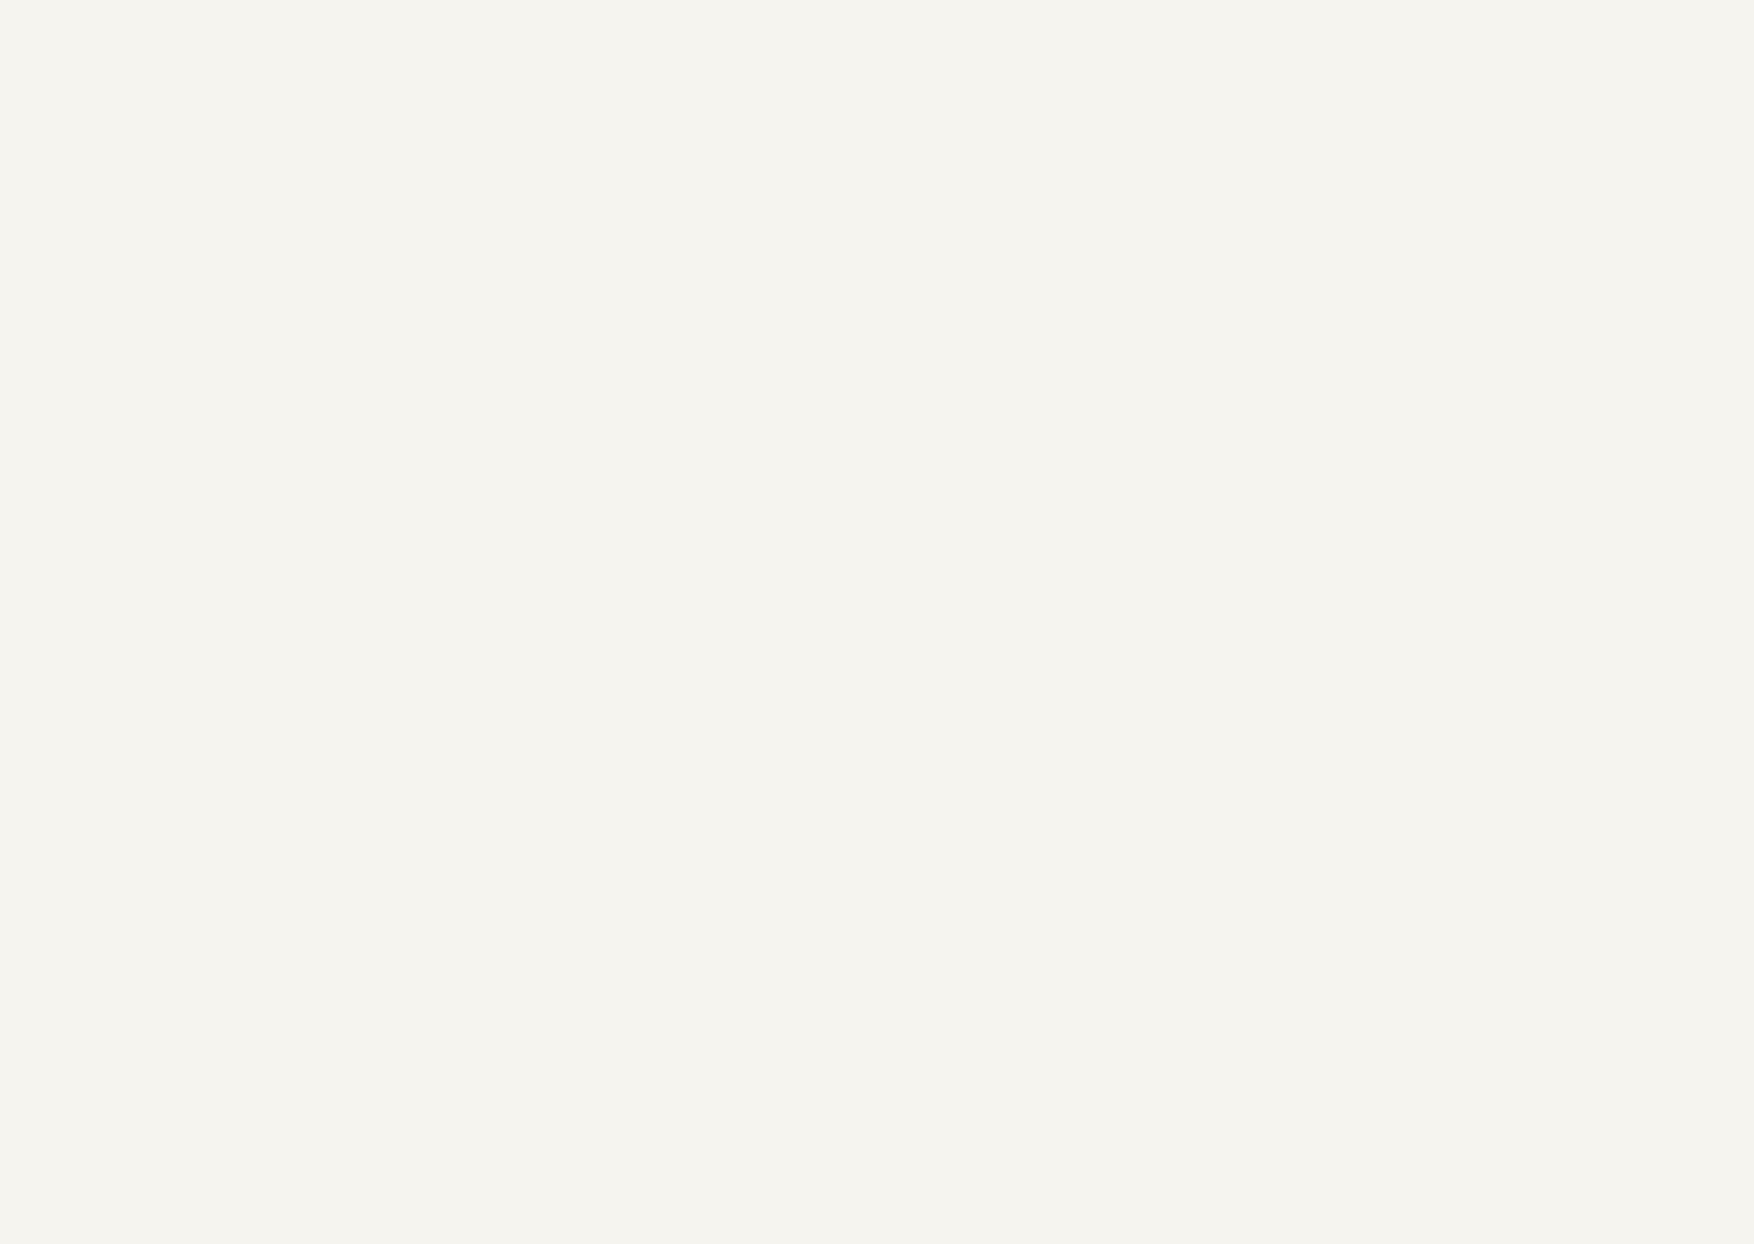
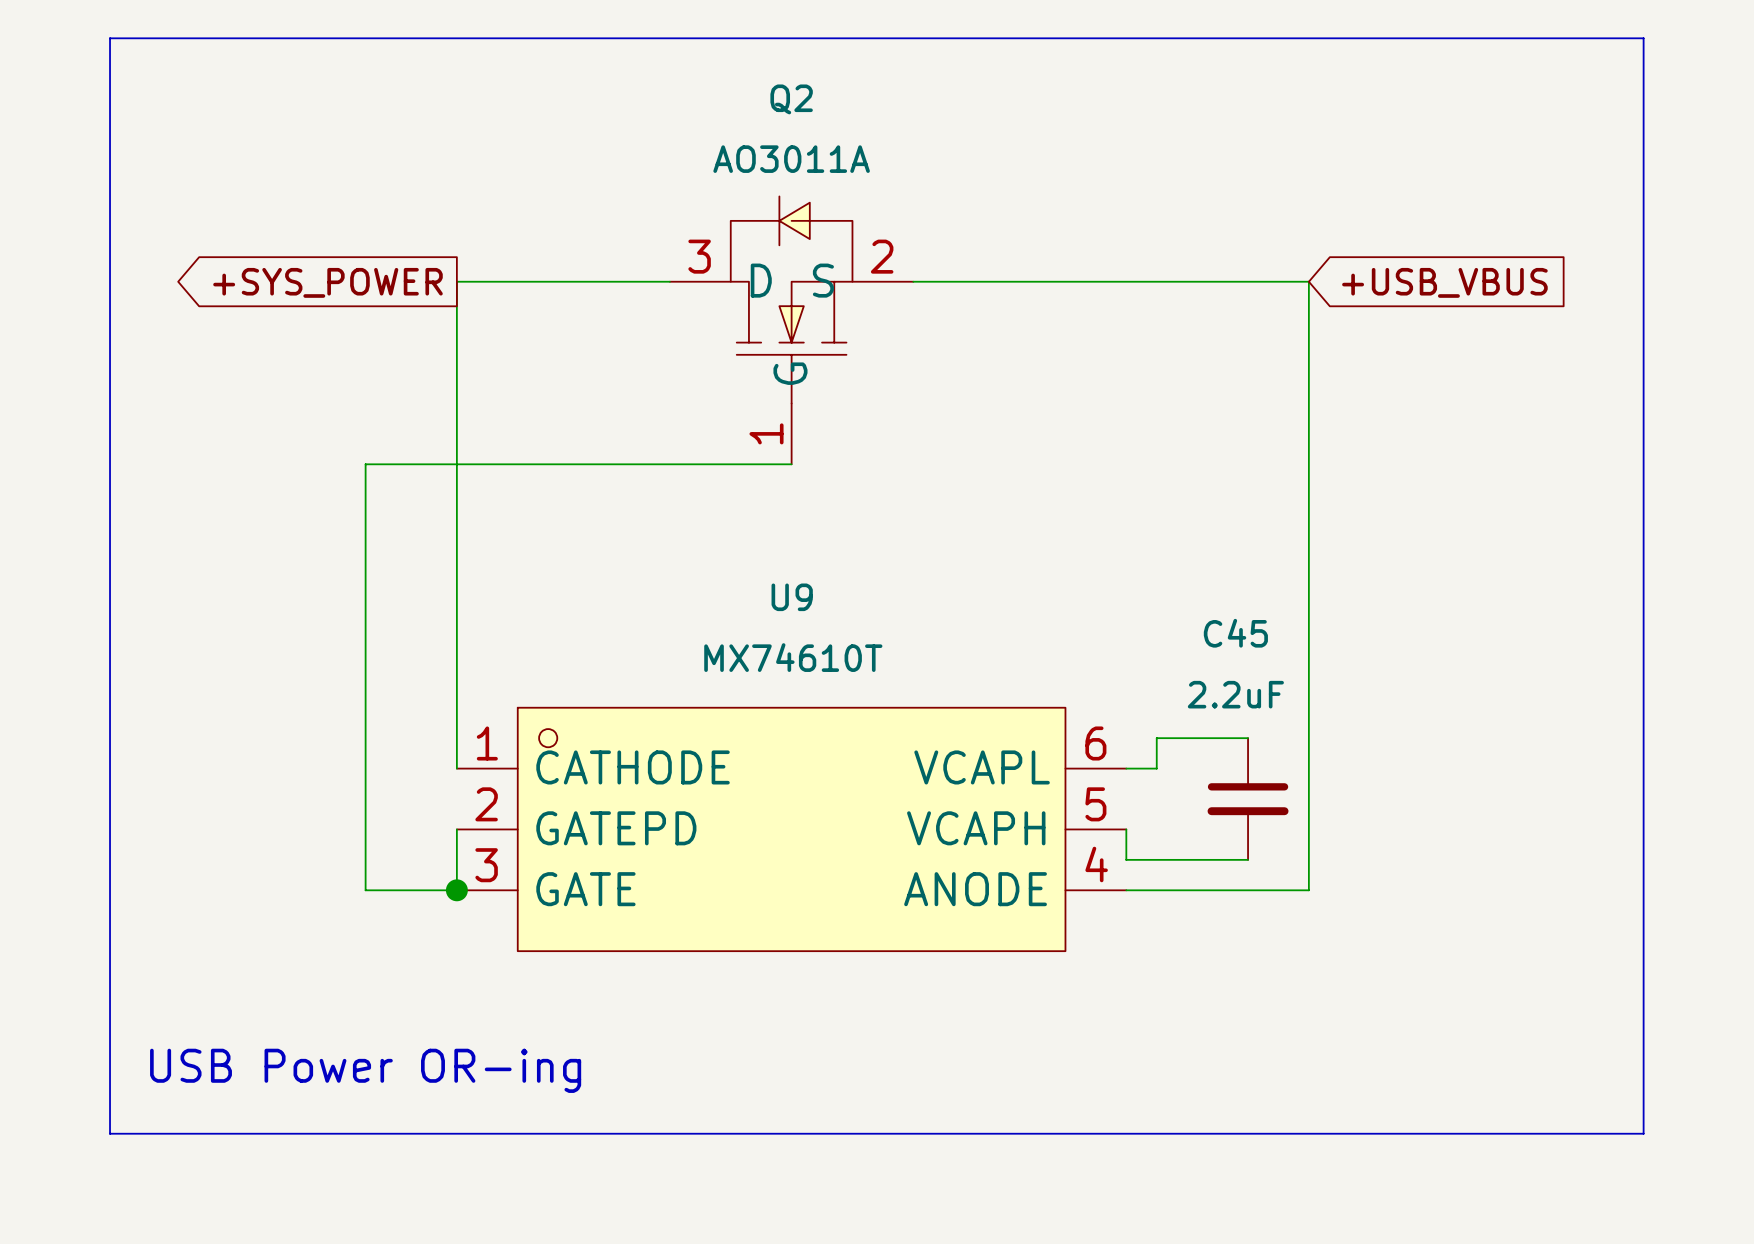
line: none -> (110, 38) (1643, 38) (1643, 1133) (110, 1133) (110, 38)
wire: none -> (669, 281) (456, 281) (456, 768)
wire: none -> (913, 281) (1308, 281) (1308, 890) (1126, 890)
global label: none -> +SYS_POWER (327, 282)
global label: none -> +USB_VBUS (1444, 282)
Q2: none -> AO3011A (791, 330)
wire: none -> (791, 464) (365, 464) (365, 890) (456, 890) (456, 829)
wire: none -> (1248, 738) (1156, 738) (1156, 768) (1126, 768)
C45: none -> 2.2uF (1248, 799)
U9: none -> MX74610T (791, 829)
wire: none -> (1126, 829) (1126, 859) (1248, 859)
junction: none -> (456, 890)
text: none -> USB Power OR-ing (365, 1070)

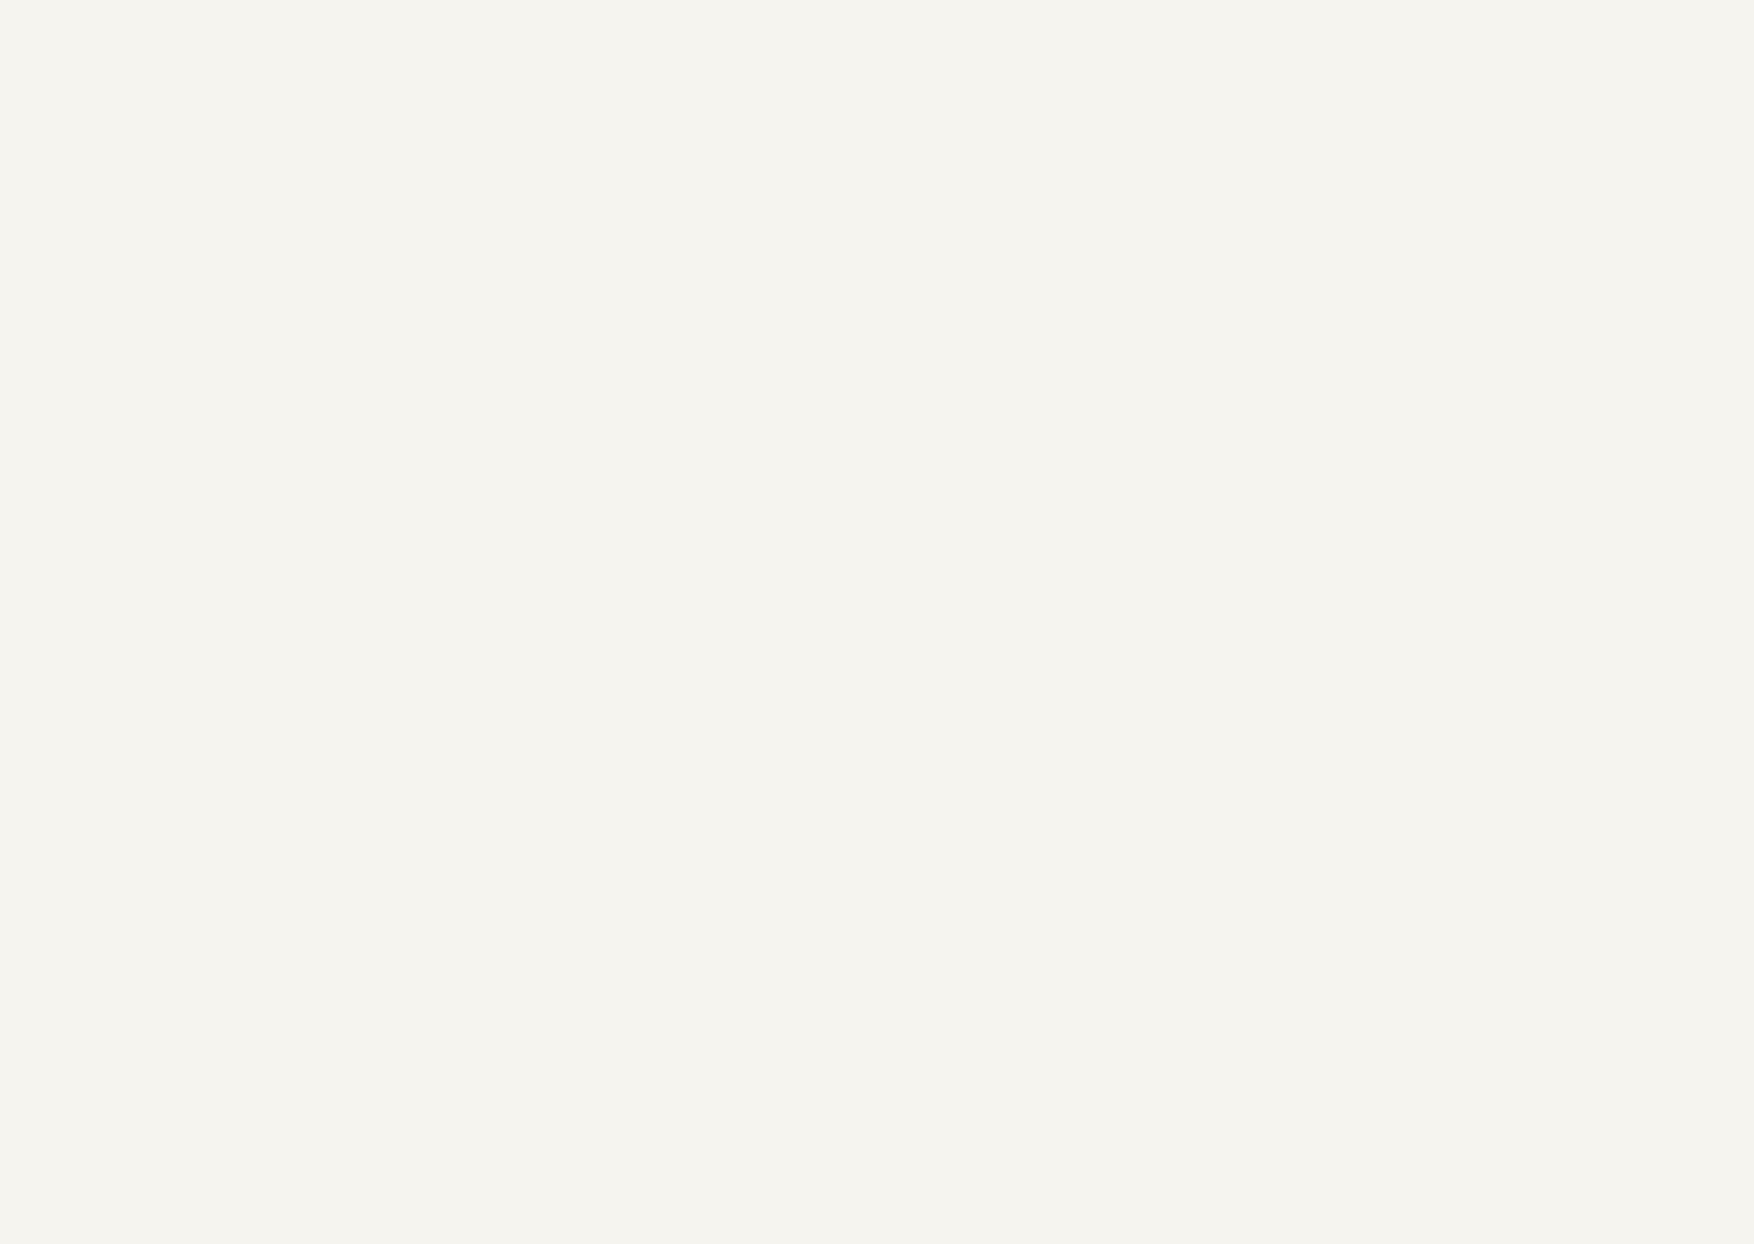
line: (110, 38) (1643, 38) (1643, 1133) (110, 1133) (110, 38) -> none
wire: (669, 281) (456, 281) (456, 768) -> none
wire: (913, 281) (1308, 281) (1308, 890) (1126, 890) -> none
global label: +SYS_POWER (327, 282) -> none
global label: +USB_VBUS (1444, 282) -> none
Q2: AO3011A (791, 330) -> none
wire: (791, 464) (365, 464) (365, 890) (456, 890) (456, 829) -> none
wire: (1248, 738) (1156, 738) (1156, 768) (1126, 768) -> none
C45: 2.2uF (1248, 799) -> none
U9: MX74610T (791, 829) -> none
wire: (1126, 829) (1126, 859) (1248, 859) -> none
junction: (456, 890) -> none
text: USB Power OR-ing (365, 1070) -> none

